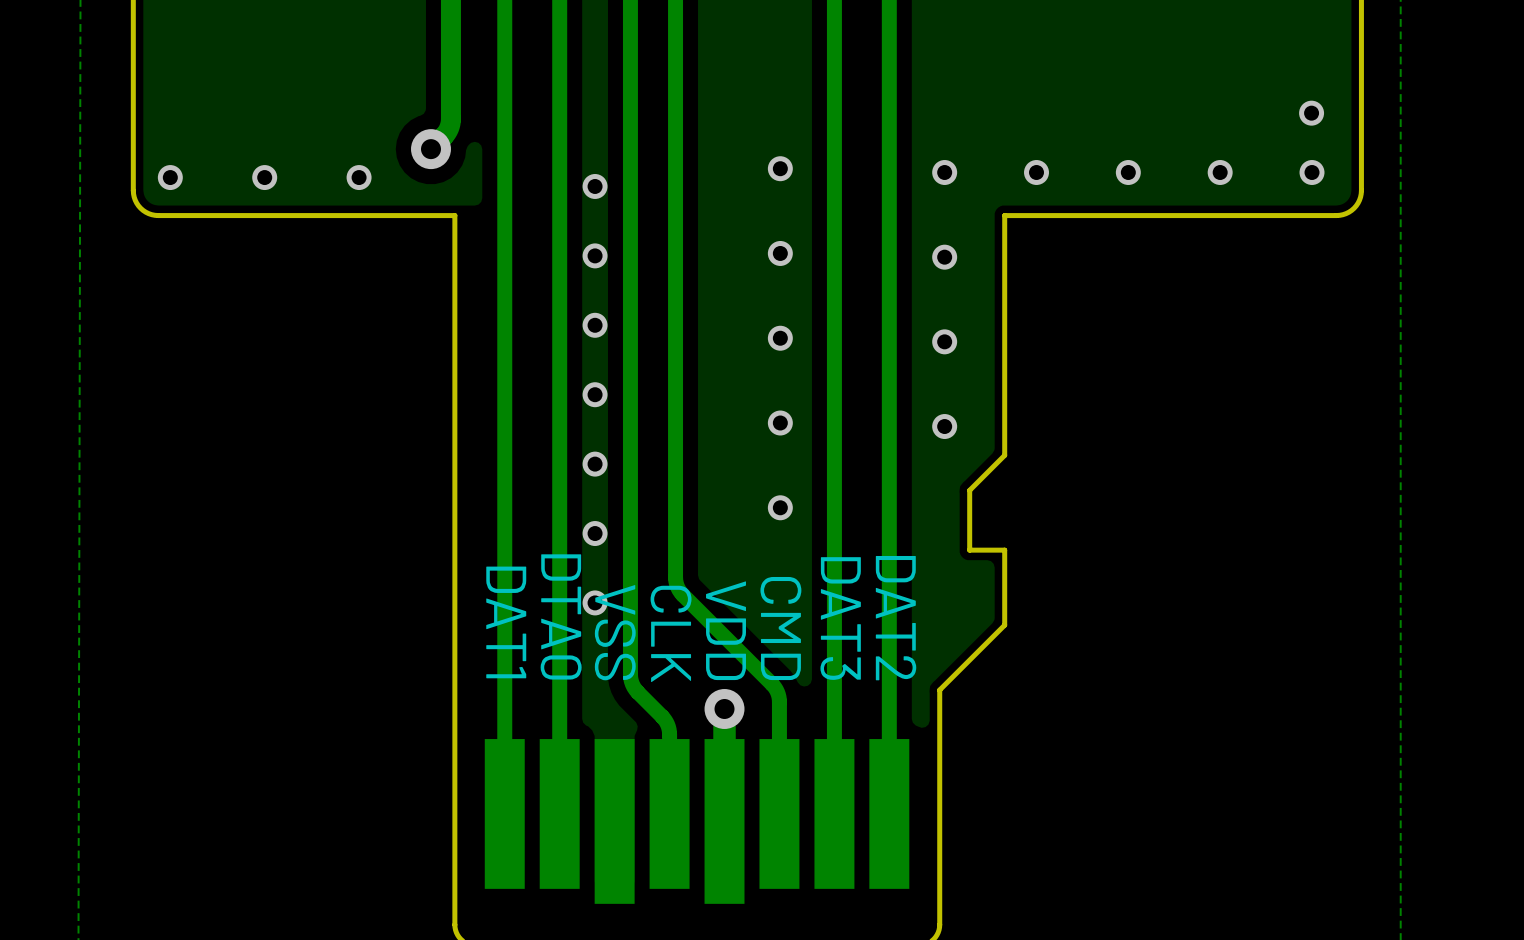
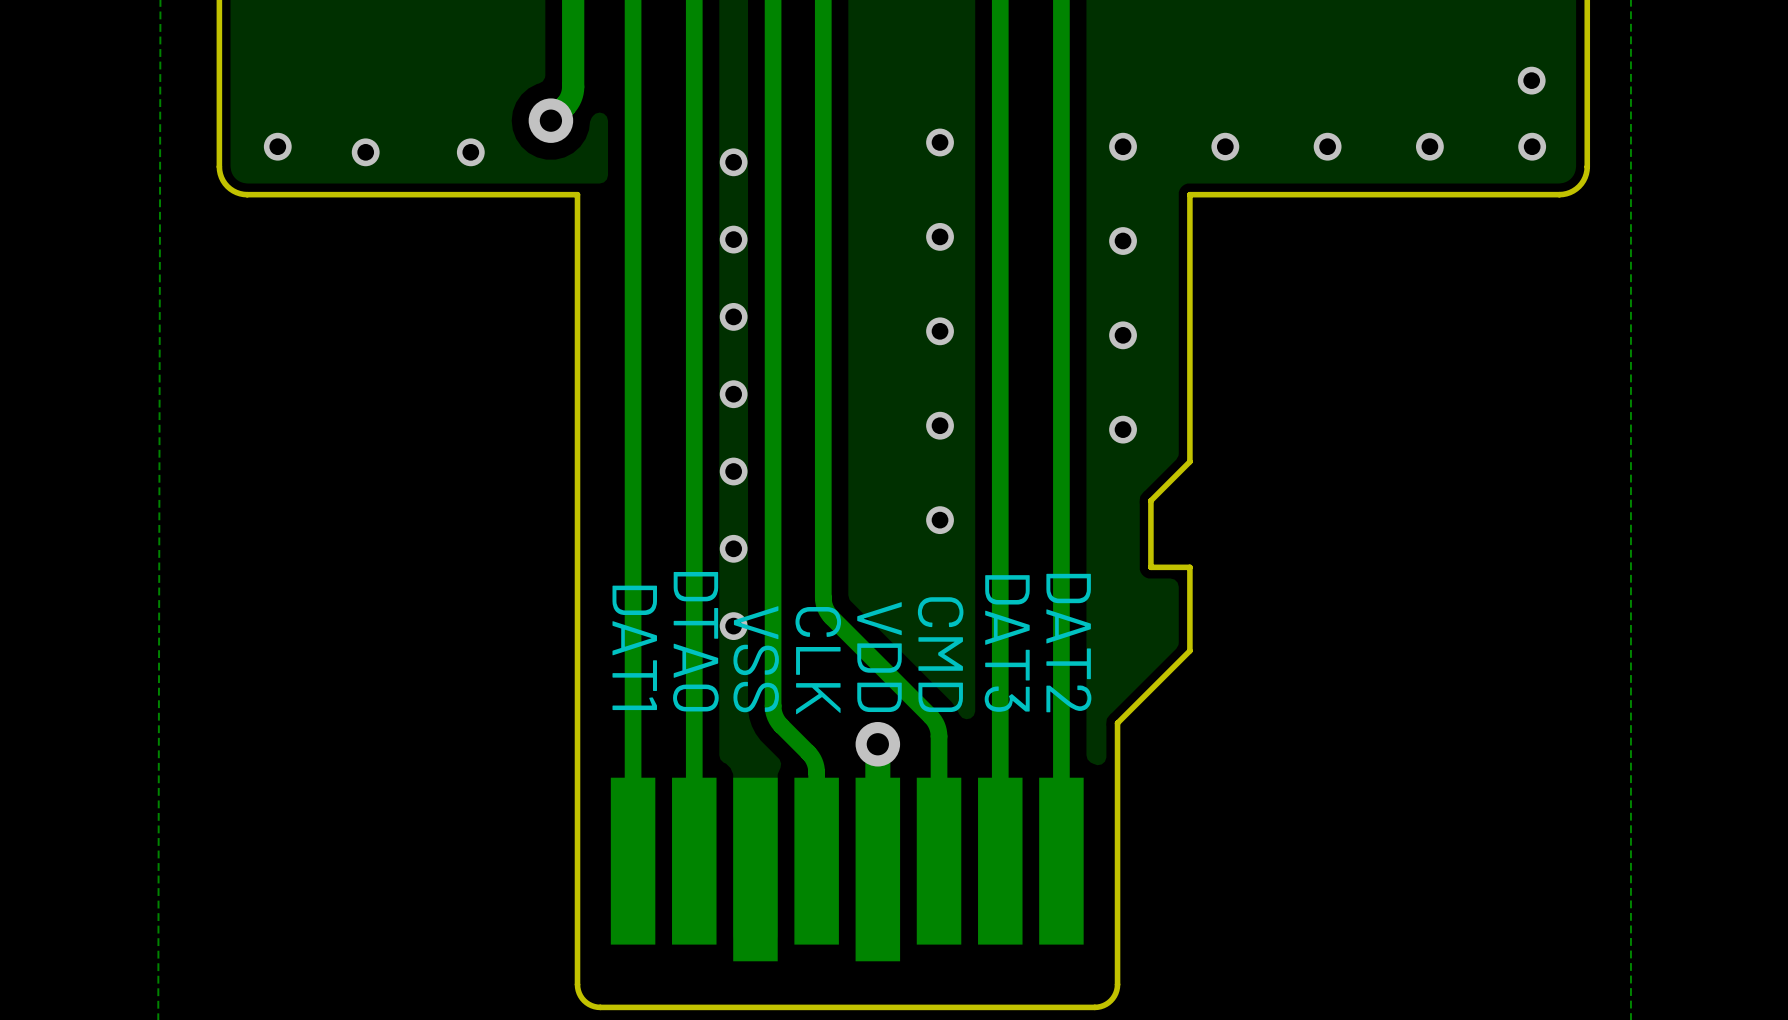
via position: (170, 177) -> (277, 146)

